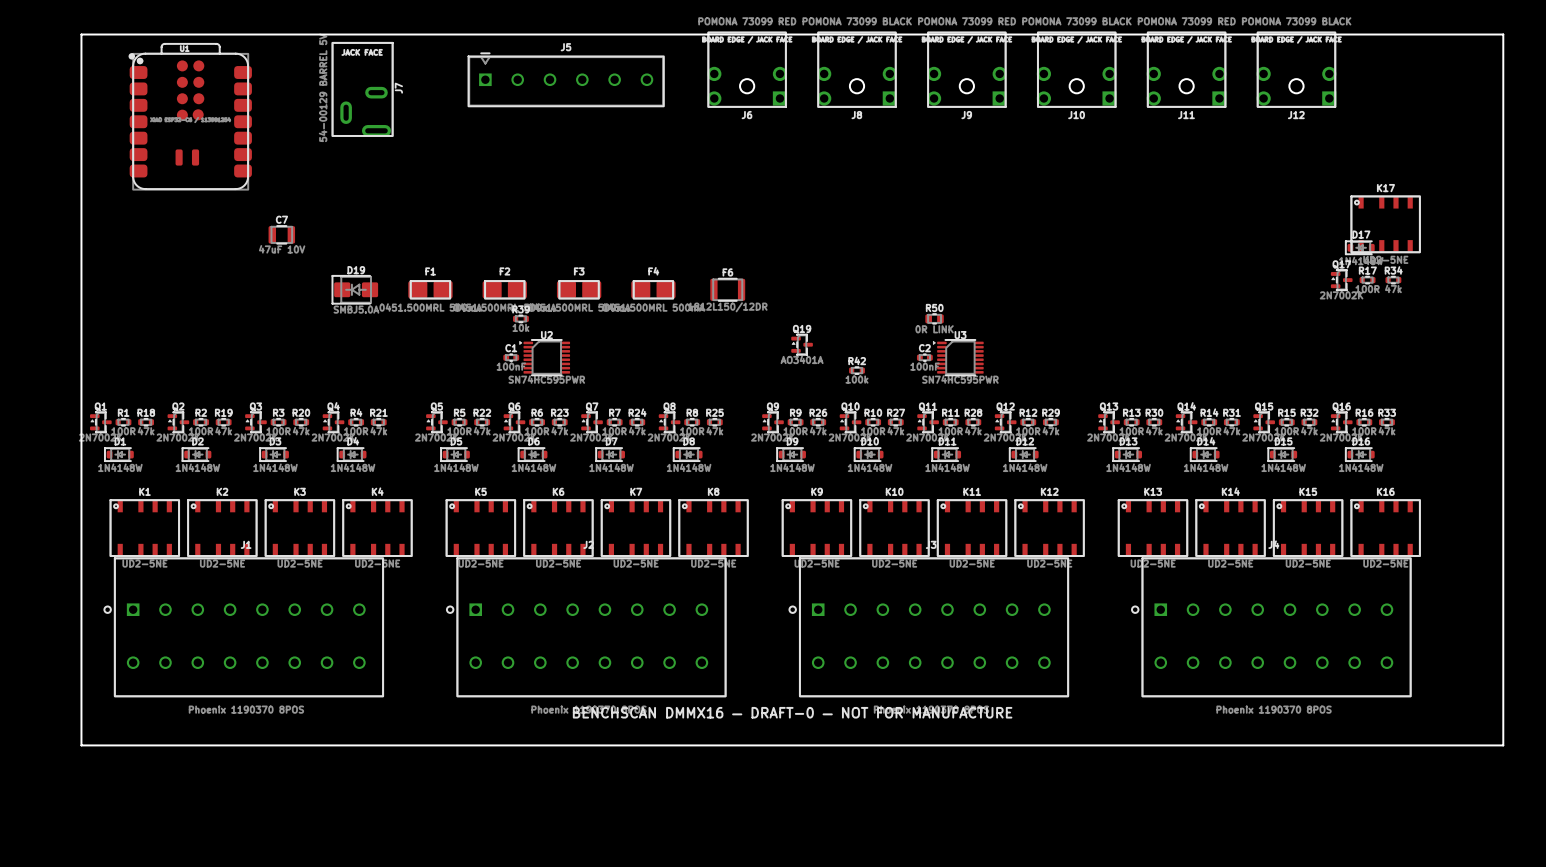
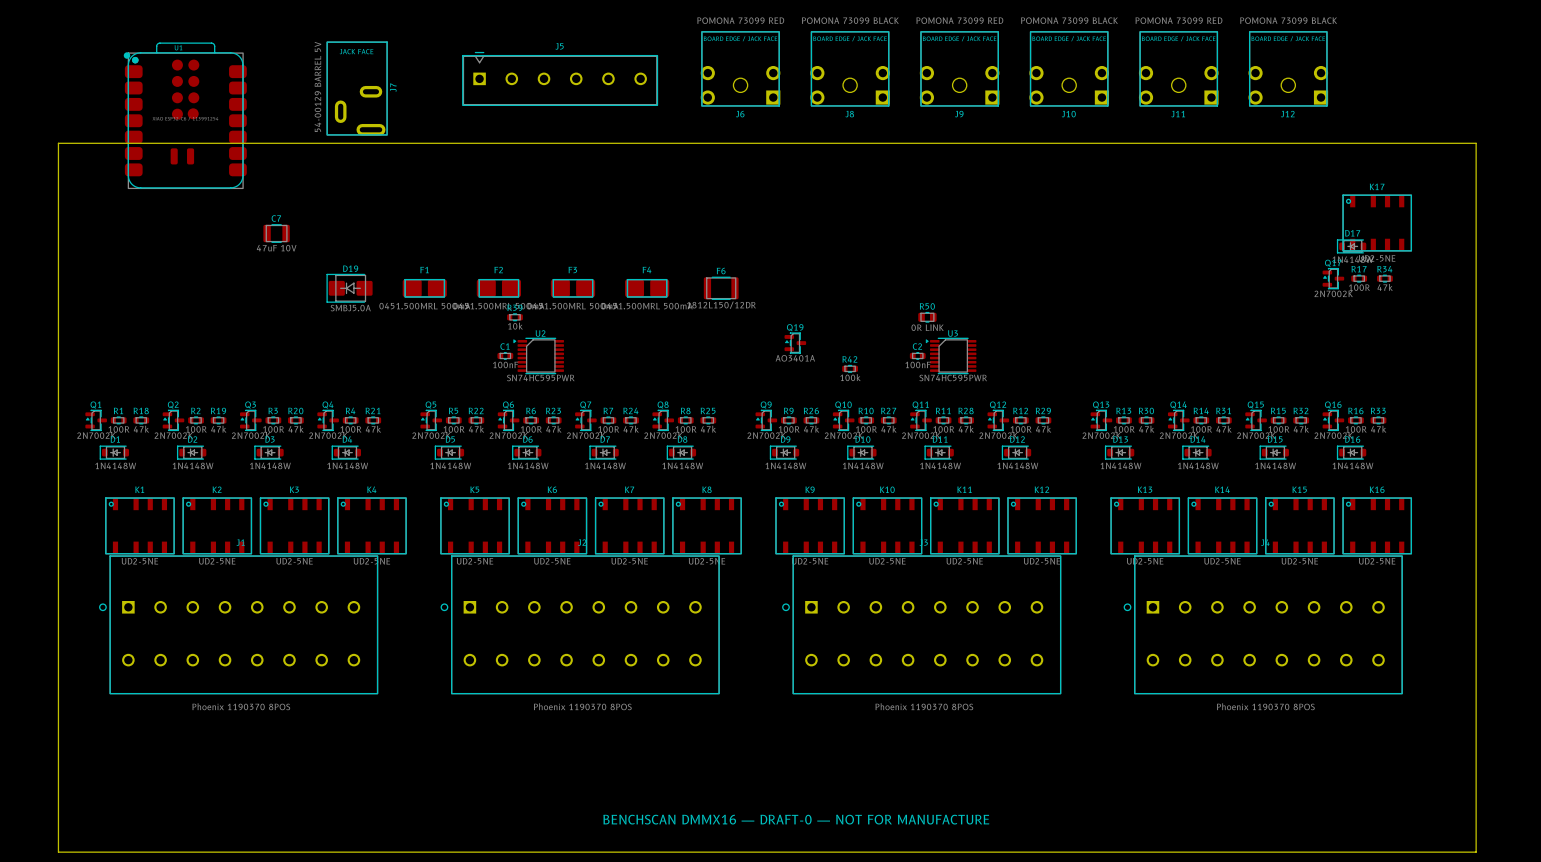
board edge: (81, 34) (1503, 34) (1503, 745) (81, 745) (81, 34) -> (58, 143) (1476, 143) (1476, 852) (58, 852) (58, 143)
text position: BENCHSCAN DMMX16 — DRAFT-0 — NOT FOR MANUFACTURE (792, 712) -> BENCHSCAN DMMX16 — DRAFT-0 — NOT FOR MANUFACTURE (796, 819)

